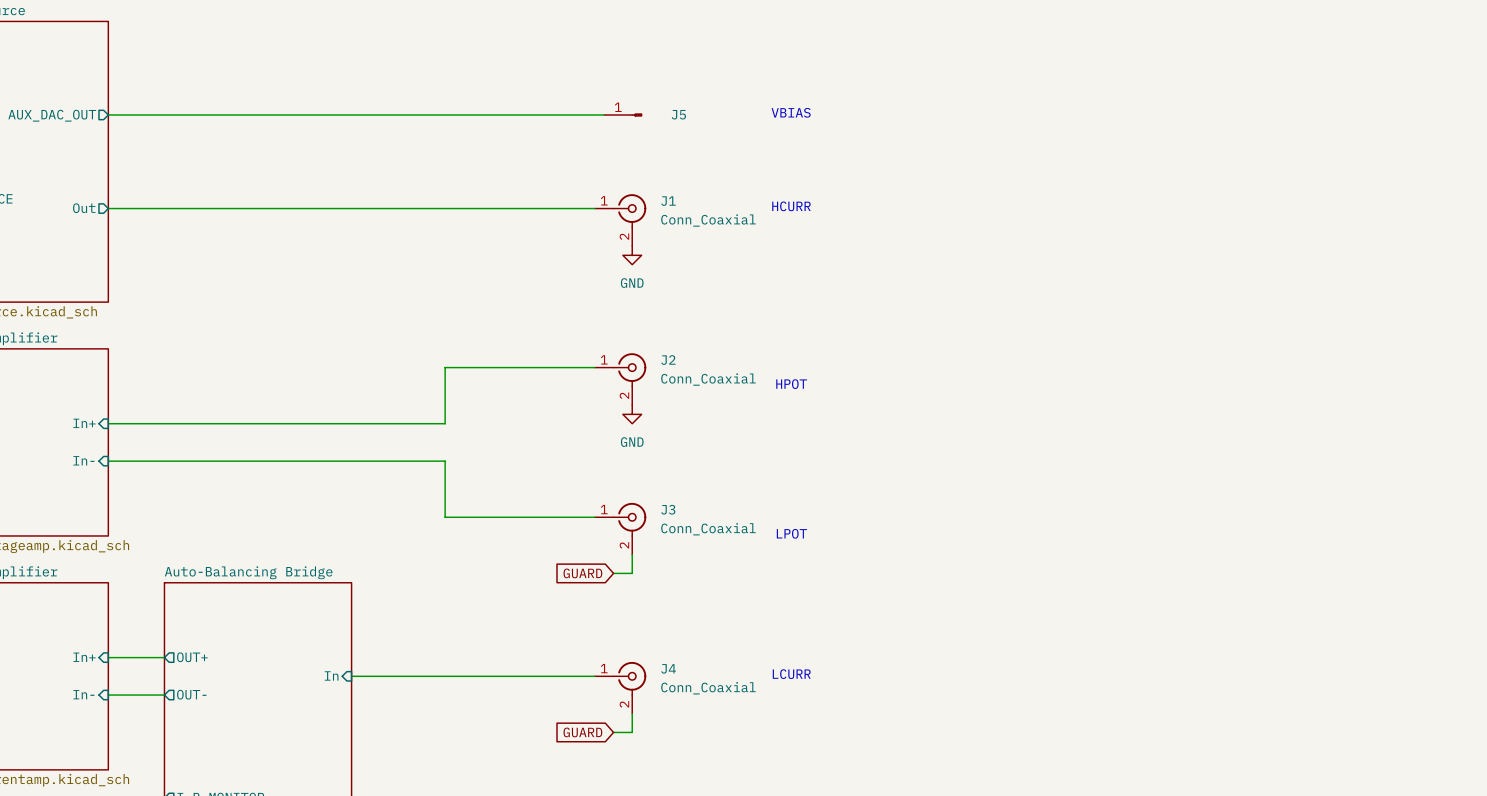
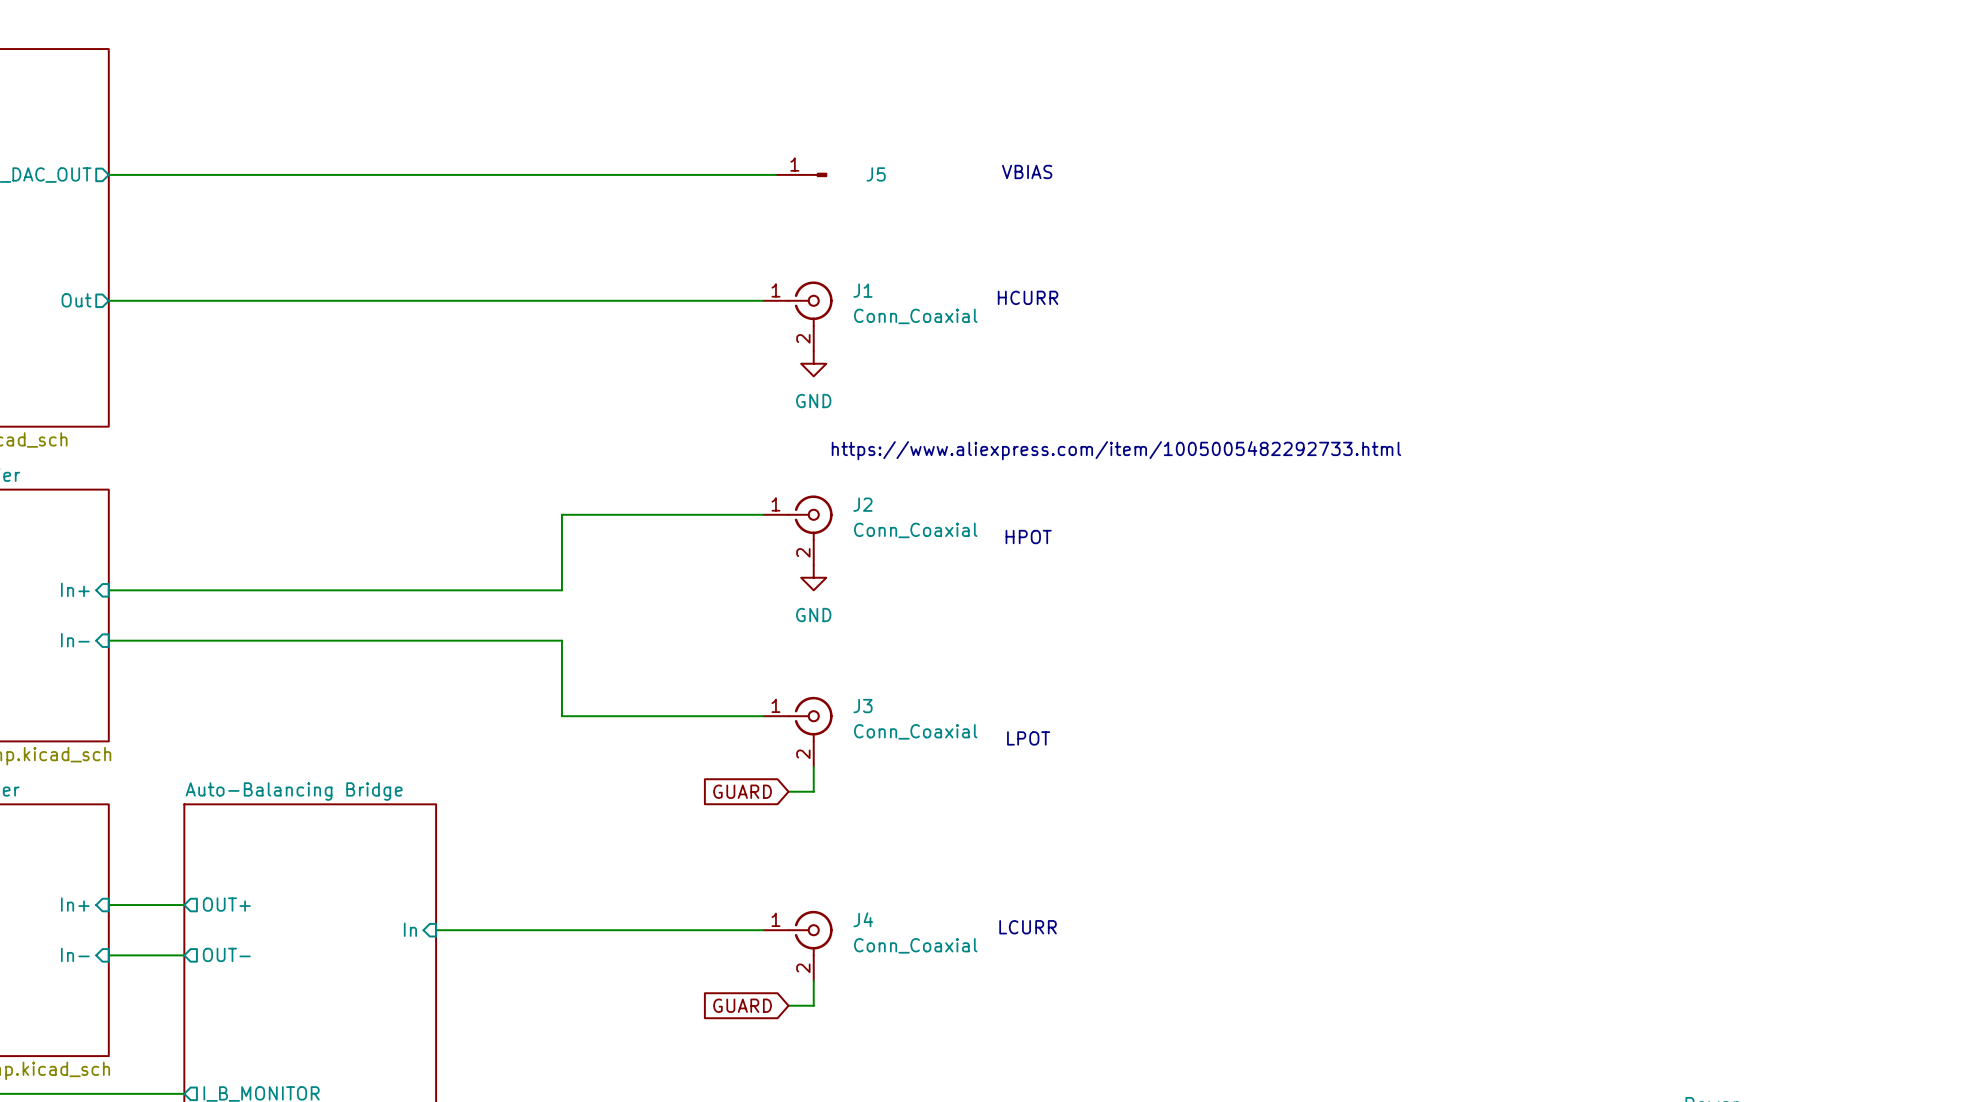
text: none -> https://www.aliexpress.com/item/1005005482292733.html (1116, 450)

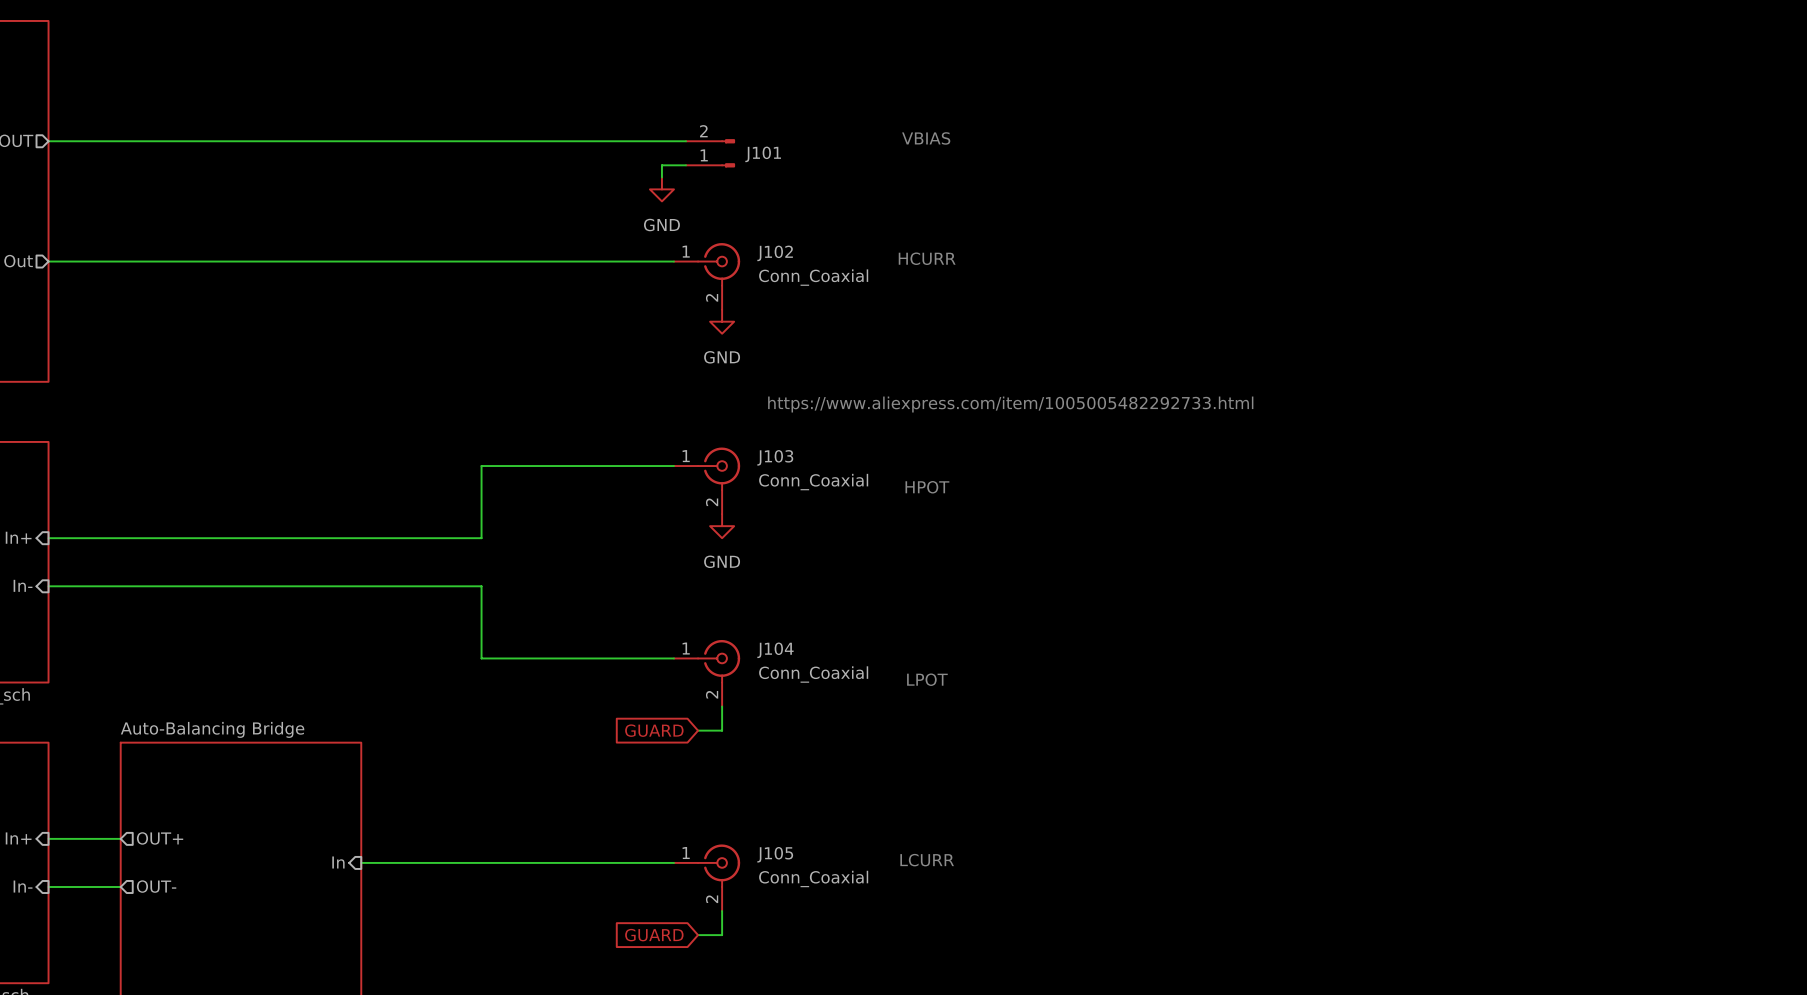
J5: (801, 174) -> none
J101: none -> (710, 153)
wire: none -> (686, 165) (661, 165) (661, 177)
power symbol: none -> GND (661, 189)
J1 name: J1 (862, 290) -> J102 (775, 253)
J2 name: J2 (862, 504) -> J103 (775, 457)
J3 name: J3 (862, 706) -> J104 (775, 650)
J4 name: J4 (863, 919) -> J105 (775, 854)

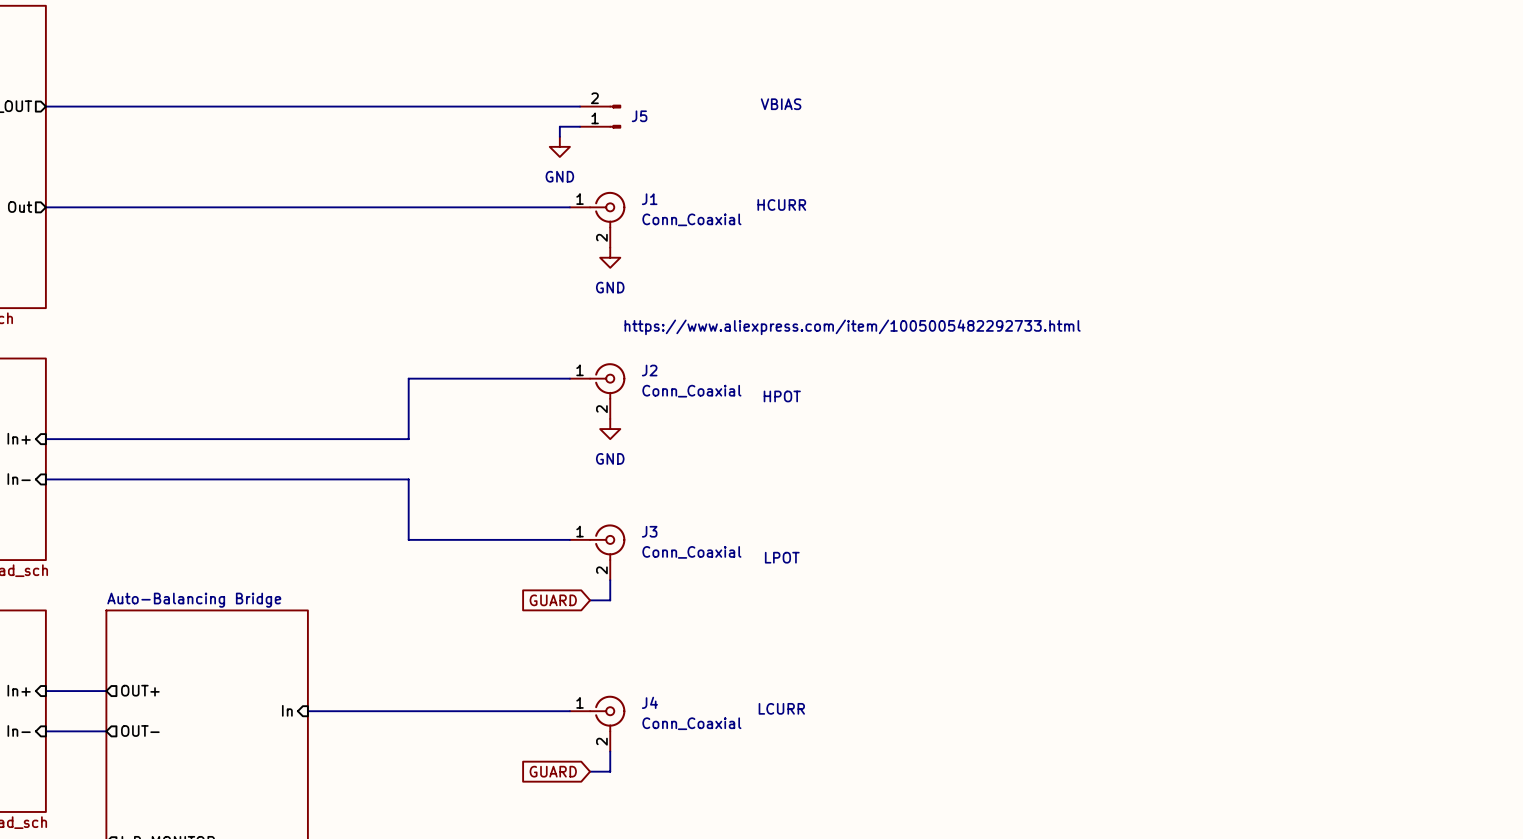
J101 name: J101 (763, 154) -> J5 (639, 116)
J102 name: J102 (775, 253) -> J1 (649, 199)
J103 name: J103 (775, 457) -> J2 (649, 370)
J104 name: J104 (775, 650) -> J3 (649, 531)
J105 name: J105 (775, 854) -> J4 (649, 702)

